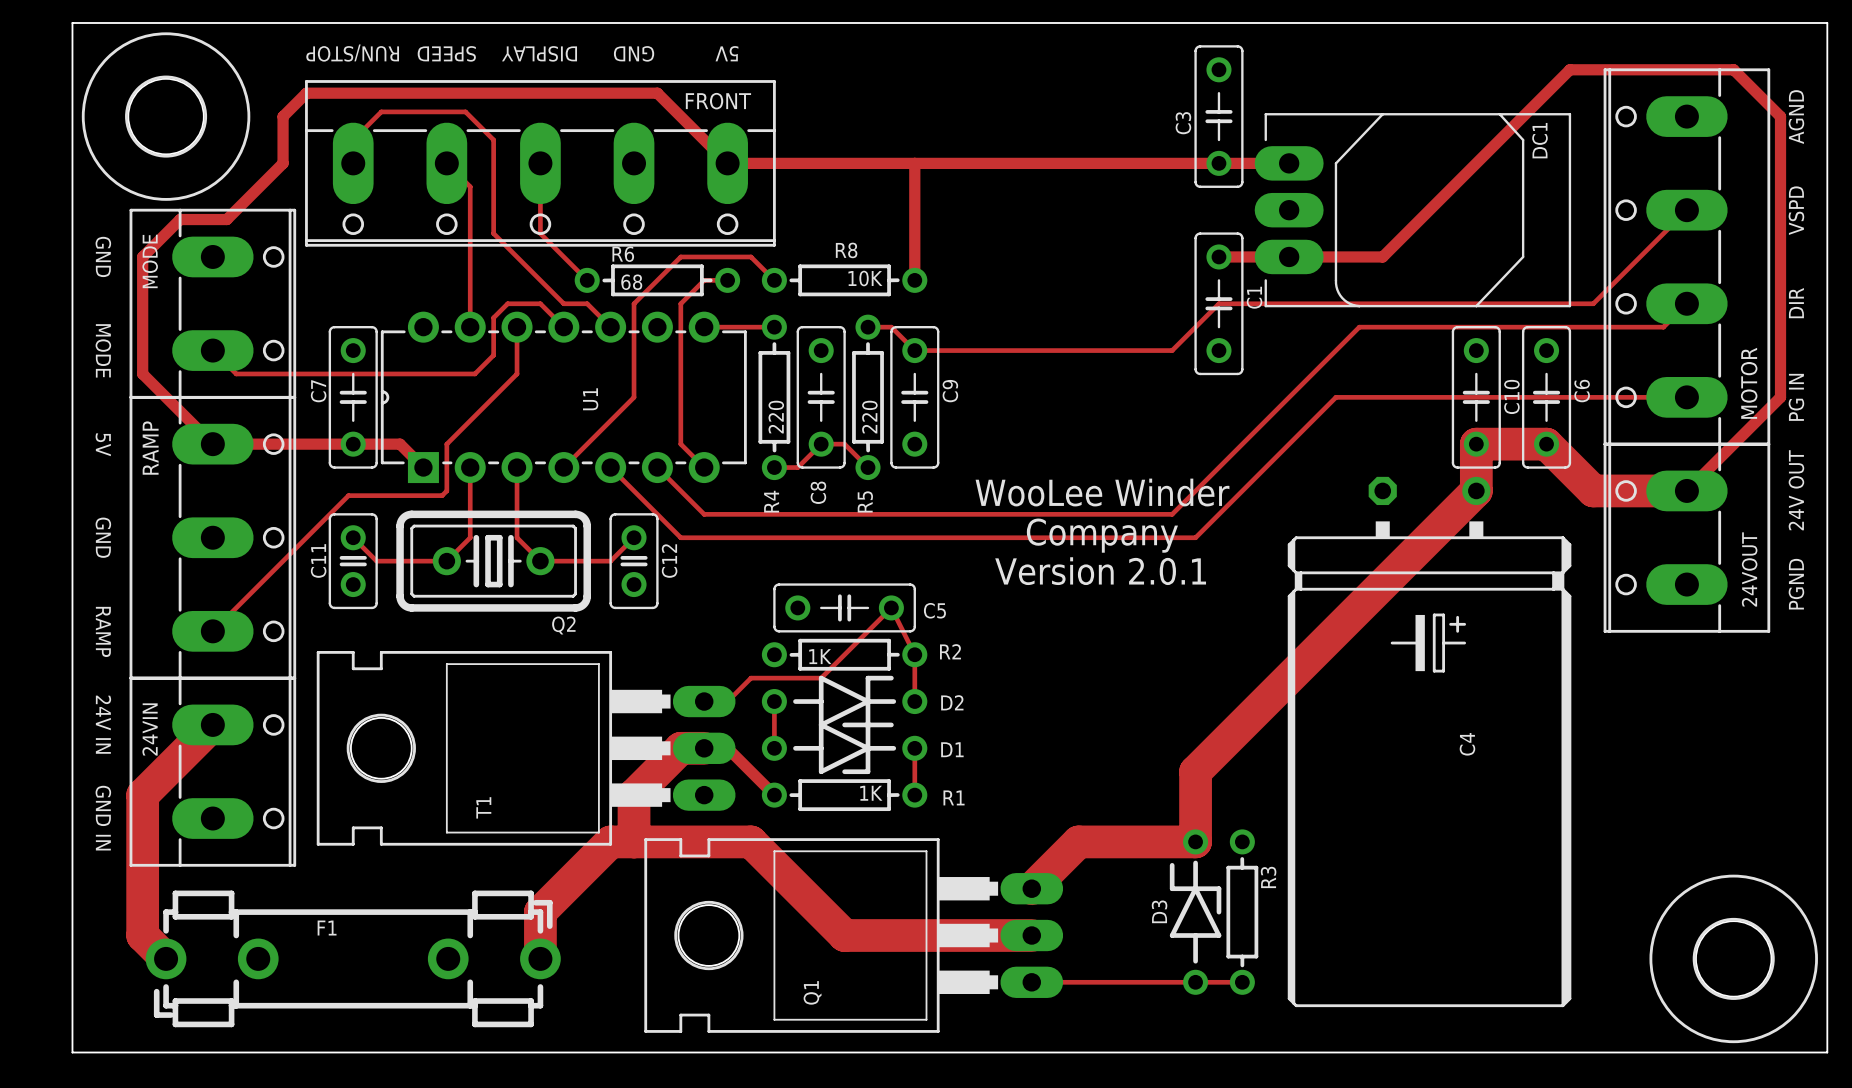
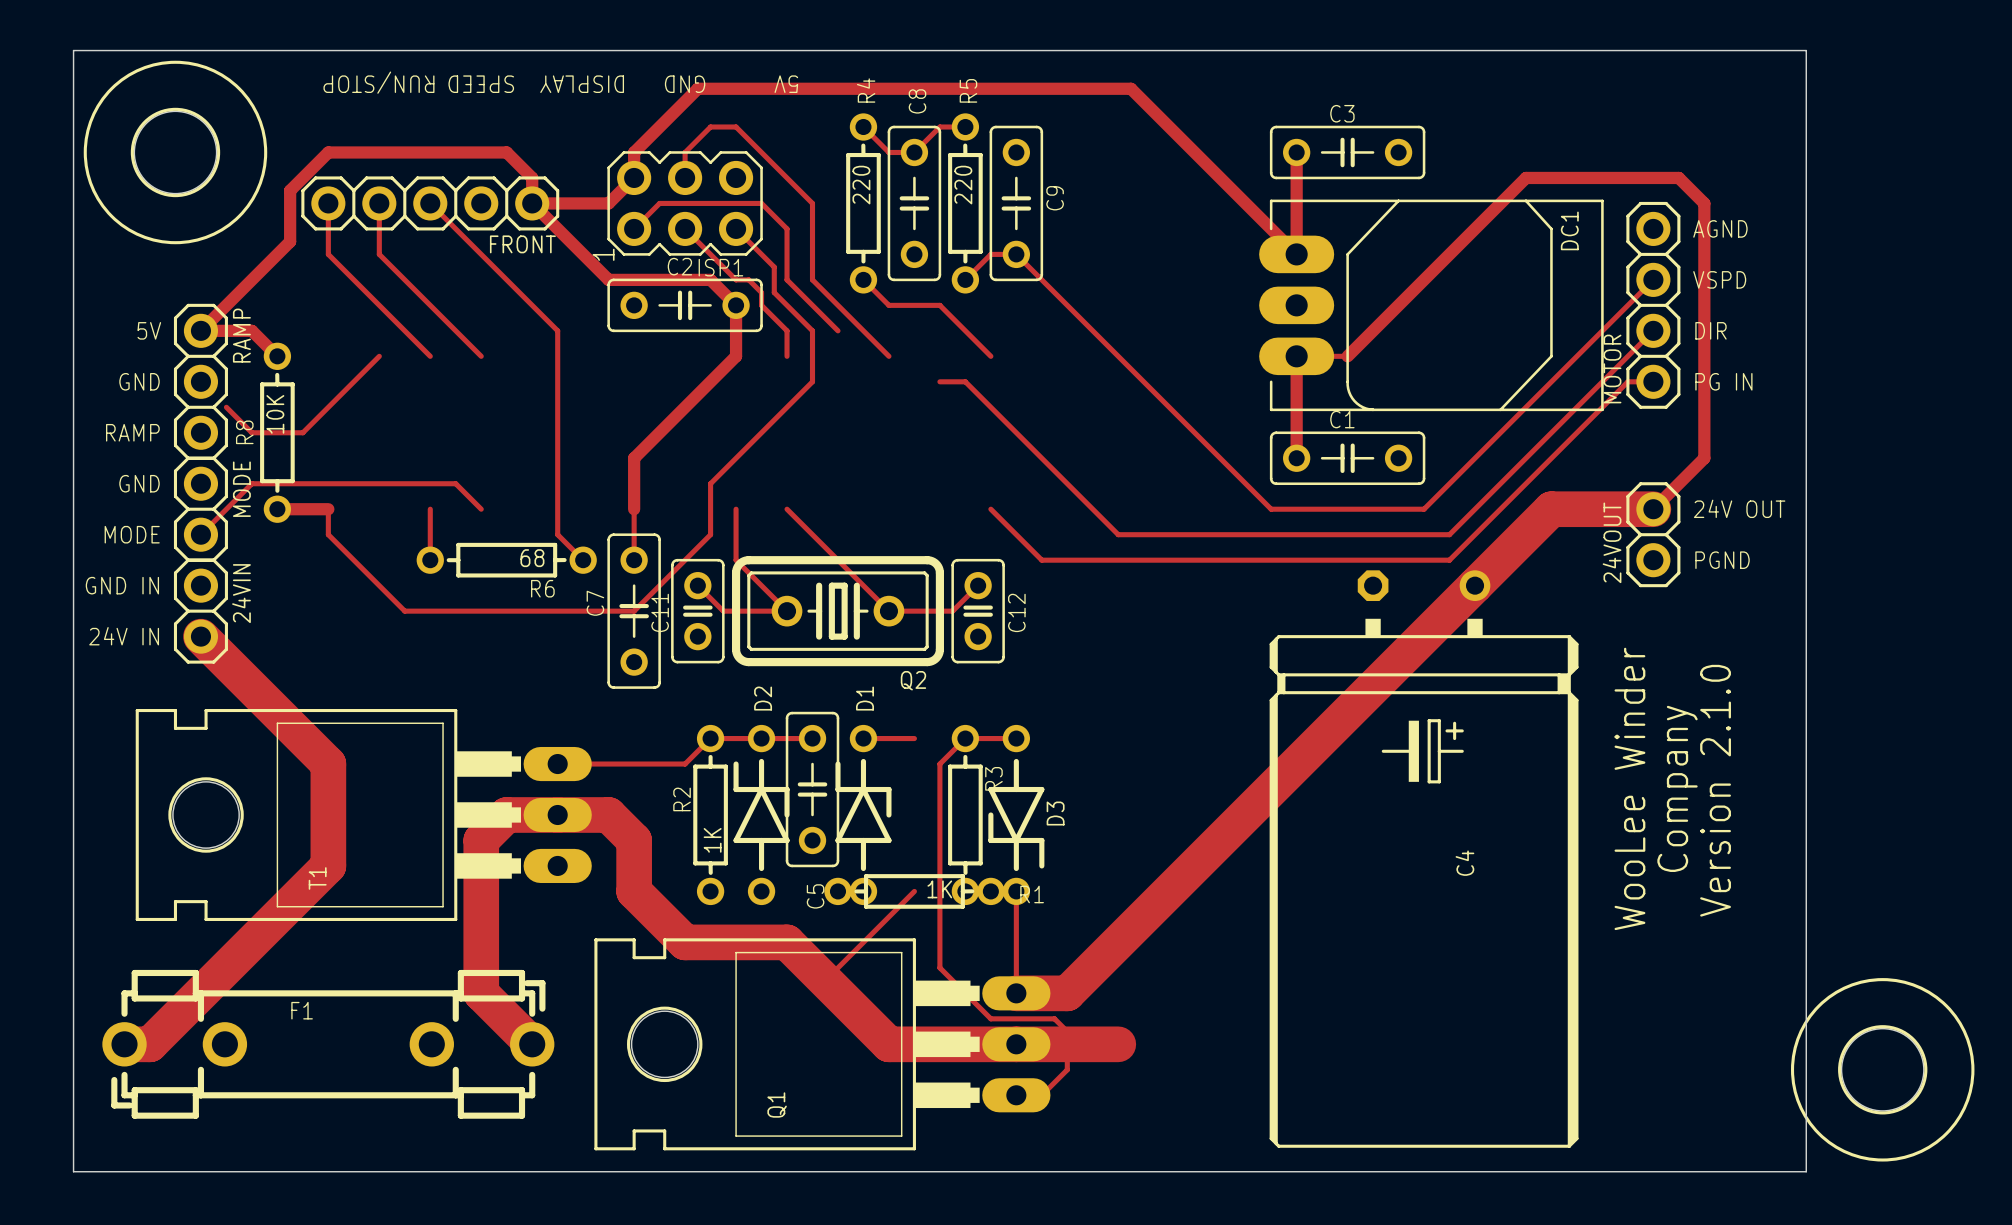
board edge: (1663, 22) (1827, 22) (1827, 1052) (1663, 1052) -> (1806, 50) (1806, 1171)
track: none -> (863, 127) (888, 152) (914, 152) (939, 127) (965, 127)
track: (470, 116) (465, 111) (381, 111) (353, 139) (353, 163) -> (506, 152) (328, 152) (290, 190) (290, 241) (200, 330) (251, 330) (277, 356)
track width: thin (470, 116) (493, 139) (493, 163) -> thick (506, 152) (532, 177) (532, 203)
track: none -> (1296, 152) (1296, 254) (1131, 88) (697, 88) (634, 152) (634, 177) (608, 203) (532, 203) (608, 279) (710, 279) (736, 305) (736, 356) (634, 458) (634, 560)
C3 rotation: 0° (1218, 116) -> 90° clockwise (1347, 152)
text rotation: 0° (1796, 117) -> 90° clockwise (1720, 228)
text position: AGND (1796, 117) -> AGND (1720, 228)
track: none -> (685, 177) (685, 152) (710, 127) (736, 127) (812, 203) (812, 279) (888, 356)
track: none -> (328, 203) (328, 254) (430, 356)
track: none -> (379, 203) (379, 254) (481, 356)
track: none -> (430, 203) (557, 330) (557, 381)
FRONT: none -> (430, 203)
track: (446, 163) (470, 186) (470, 327) -> none
track: (493, 163) (493, 233) (563, 303) (587, 303) (610, 327) -> none
track: (540, 163) (540, 233) (587, 280) -> none
FRONT: (540, 163) -> none
ISP1: none -> (685, 203)
track: (914, 163) (914, 280) -> none
track: (1289, 163) (727, 163) (657, 93) (306, 93) (283, 116) (283, 163) (226, 219) (180, 219) (142, 256) (142, 373) (212, 444) (259, 444) -> none
track: none -> (685, 228) (736, 279) (748, 279) (761, 292) (761, 305) (787, 330) (787, 356)
DC1 position: (1412, 210) -> (1431, 305)
track: (1686, 210) (1593, 303) (1242, 303) -> none
text rotation: 0° (1796, 210) -> 90° clockwise (1719, 279)
text position: VSPD (1796, 210) -> VSPD (1719, 279)
track: none -> (863, 279) (888, 305) (939, 305) (990, 356)
track: none -> (965, 279) (990, 254) (1016, 254) (1271, 509) (1424, 509) (1653, 279)
R8 name position: R8 (846, 250) -> R8 (244, 432)
R6 name position: R6 (623, 254) -> R6 (542, 588)
text: GND (103, 256) -> none
C2: none -> (685, 305)
track: (751, 256) (680, 256) (634, 303) (634, 397) (563, 467) -> (812, 305) (787, 279) (787, 228) (761, 203) (659, 203) (634, 228)
track: (1218, 256) (1382, 256) (1569, 69) (1733, 69) (1780, 116) (1780, 397) (1686, 490) (1593, 490) (1546, 444) (1523, 444) -> (1347, 356) (1525, 177) (1678, 177) (1704, 203) (1704, 458) (1653, 509)
MOTOR: none -> (1653, 305)
MOTOR: (1686, 256) -> none
R6 position: (657, 280) -> (506, 560)
track: (727, 280) (704, 280) (680, 303) (680, 444) (704, 467) -> none
R8 rotation: 0° (844, 280) -> 90° clockwise (277, 432)
R8 position: (844, 280) -> (277, 432)
track: none -> (1653, 330) (1449, 534) (1118, 534) (990, 407)
R6 value position: 68 (631, 282) -> 68 (532, 558)
C1 name position: C1 (1254, 297) -> C1 (1342, 419)
MODE: (212, 303) -> none
track: (1218, 303) (1172, 350) (914, 350) -> (1322, 356) (1296, 356) (1296, 458)
C1 rotation: 0° (1218, 303) -> 90° clockwise (1347, 458)
C1 position: (1218, 303) -> (1347, 458)
track: (1686, 303) (1663, 327) (1523, 327) -> none
text rotation: 0° (1796, 303) -> 90° clockwise (1710, 330)
text position: DIR (1796, 303) -> DIR (1710, 330)
text: none -> GND (139, 381)
RAMP: none -> (200, 381)
track: (563, 327) (540, 303) (507, 303) (493, 317) (493, 355) (474, 373) (283, 373) -> (379, 356) (302, 432)
track: (704, 327) (774, 327) -> none
track: (1499, 327) (1359, 327) (1172, 514) (704, 514) -> (1627, 381) (1449, 560) (1041, 560) (990, 509)
text rotation: 0° (103, 350) -> 90° counterclockwise (132, 534)
text position: MODE (103, 350) -> MODE (132, 534)
track: (517, 373) (446, 444) (446, 490) (442, 495) (348, 495) (212, 631) -> (557, 432) (557, 534) (583, 560)
C7 name position: C7 (318, 391) -> C7 (595, 603)
C7 position: (353, 397) -> (634, 611)
U1: (563, 397) -> none
R4 position: (774, 397) -> (863, 203)
C8 position: (821, 397) -> (914, 203)
R5 position: (868, 397) -> (965, 203)
C9 position: (914, 397) -> (1016, 203)
C10: (1476, 397) -> none
C6: (1546, 397) -> none
track: (1686, 397) (1335, 397) (1195, 537) (879, 537) -> (978, 585) (952, 611)
text rotation: 0° (1796, 397) -> 90° clockwise (1723, 381)
text position: PG IN (1796, 397) -> PG IN (1723, 381)
R4 value position: 220 (776, 417) -> 220 (861, 185)
R5 value position: 220 (869, 417) -> 220 (963, 185)
text: none -> GND (139, 483)
24VOUT footprint: [1603, 442, 1771, 633] -> [1626, 482, 1681, 588]
text rotation: 0° (103, 444) -> 90° counterclockwise (149, 330)
text position: 5V (103, 444) -> 5V (149, 330)
MODE: none -> (200, 509)
track: (306, 444) (400, 444) (423, 467) -> (328, 509) (328, 534) (404, 611) (634, 611) (710, 534) (710, 483) (812, 381) (812, 330) (774, 292) (774, 267) (736, 228)
track: none -> (481, 509) (455, 483) (251, 483) (200, 534)
track: (1476, 444) (1476, 490) (1195, 771) (1195, 841) (1078, 841) (1031, 888) -> (1602, 509) (1551, 509) (1067, 993) (1016, 993) (1016, 891)
track: (470, 467) (470, 537) (446, 561) (376, 561) (353, 537) -> none
track: (517, 467) (517, 537) (540, 561) (610, 561) (634, 537) -> none
track: (610, 467) (680, 537) -> (697, 585) (723, 611) (736, 611)
track: (657, 467) (680, 490) -> (736, 509) (736, 560)
track: (774, 467) (797, 467) (821, 444) (844, 444) (868, 467) -> none
text rotation: 0° (1796, 490) -> 90° clockwise (1739, 508)
text position: 24V OUT (1796, 490) -> 24V OUT (1739, 508)
C8 name position: C8 (818, 492) -> C8 (917, 101)
text rotation: 0° (1102, 492) -> 90° counterclockwise (1629, 788)
text position: WooLee Winder (1102, 492) -> WooLee Winder (1629, 788)
R4 name position: R4 (771, 501) -> R4 (866, 90)
R5 name position: R5 (865, 501) -> R5 (968, 90)
track: none -> (761, 585) (787, 611)
text: Company (1102, 535) -> none
text: GND (103, 537) -> none
RAMP: (212, 537) -> none
track: (727, 537) (821, 537) -> (787, 509) (888, 611)
track: none -> (200, 636) (328, 764) (328, 865) (149, 1044) (124, 1044)
C11 position: (353, 561) -> (697, 611)
Q2 position: (493, 561) -> (837, 611)
C12 position: (634, 561) -> (978, 611)
24VOUT name position: 24VOUT (1749, 569) -> 24VOUT (1612, 542)
text: Version 2.0.1 (1100, 571) -> none
text rotation: 0° (1796, 584) -> 90° clockwise (1722, 560)
text position: PGND (1796, 584) -> PGND (1722, 560)
C5 rotation: 0° (844, 607) -> 90° clockwise (812, 789)
C5 position: (844, 607) -> (812, 789)
text rotation: 0° (103, 631) -> 90° counterclockwise (132, 432)
text position: RAMP (103, 631) -> RAMP (132, 432)
R2 name position: R2 (950, 651) -> R2 (682, 799)
track: none -> (812, 738) (710, 738) (685, 764) (557, 764)
track: none -> (863, 738) (914, 738)
R2 rotation: 0° (844, 654) -> 90° clockwise (710, 814)
R2 position: (844, 654) -> (710, 814)
track: none -> (1016, 738) (965, 738) (939, 764) (939, 967) (990, 1018) (1054, 1018) (1067, 1031) (1067, 1069) (1041, 1095) (1016, 1095)
24VIN footprint: [129, 676, 297, 867] -> [173, 558, 228, 664]
track: (704, 701) (727, 701) (751, 678) (821, 678) (891, 607) (914, 654) (914, 701) -> none
track: (774, 701) (774, 748) -> (430, 509) (430, 560)
D2 rotation: 0° (844, 701) -> 90° counterclockwise (761, 814)
D2 position: (844, 701) -> (761, 814)
text: none -> Company (1677, 788)
text: none -> Version 2.1.0 (1715, 790)
text rotation: 0° (103, 724) -> 90° counterclockwise (124, 636)
text position: 24V IN (103, 724) -> 24V IN (124, 636)
track: (212, 724) (142, 795) (142, 935) (166, 958) -> none
24VIN name position: 24VIN (150, 729) -> 24VIN (241, 593)
C4 position: (1429, 741) -> (1424, 859)
T1 position: (526, 748) -> (363, 814)
D1 rotation: 0° (844, 748) -> 90° counterclockwise (863, 814)
track: (914, 748) (914, 795) -> none
track: (774, 795) (727, 748) (680, 748) (634, 795) (634, 841) (610, 841) (540, 912) (540, 958) -> none
track: none -> (914, 891) (825, 980)
text rotation: 0° (103, 818) -> 90° counterclockwise (122, 585)
text position: GND IN (103, 818) -> GND IN (122, 585)
track: none -> (685, 942) (634, 891) (634, 840) (608, 814) (506, 814) (481, 840) (481, 993) (532, 1044)
track: (727, 841) (751, 841) (844, 935) -> (787, 942) (888, 1044) (914, 1044)
D3 rotation: 0° (1195, 912) -> 180° (1016, 814)
D3 position: (1195, 912) -> (1016, 814)
R3 position: (1242, 912) -> (965, 814)
Q1 position: (853, 935) -> (822, 1044)
F1 position: (353, 958) -> (328, 1044)
track: (1031, 982) (1242, 982) -> none

